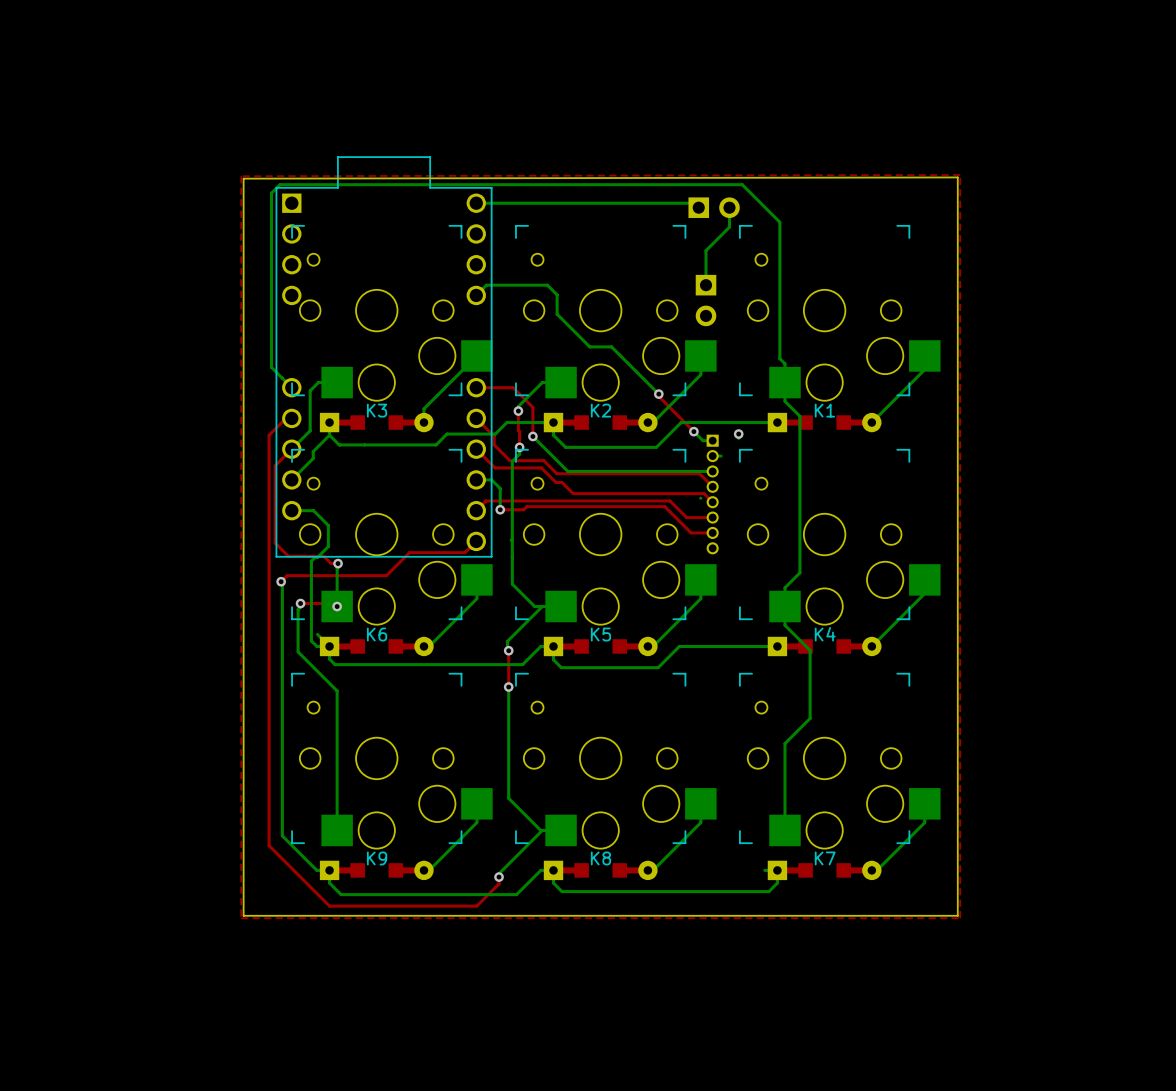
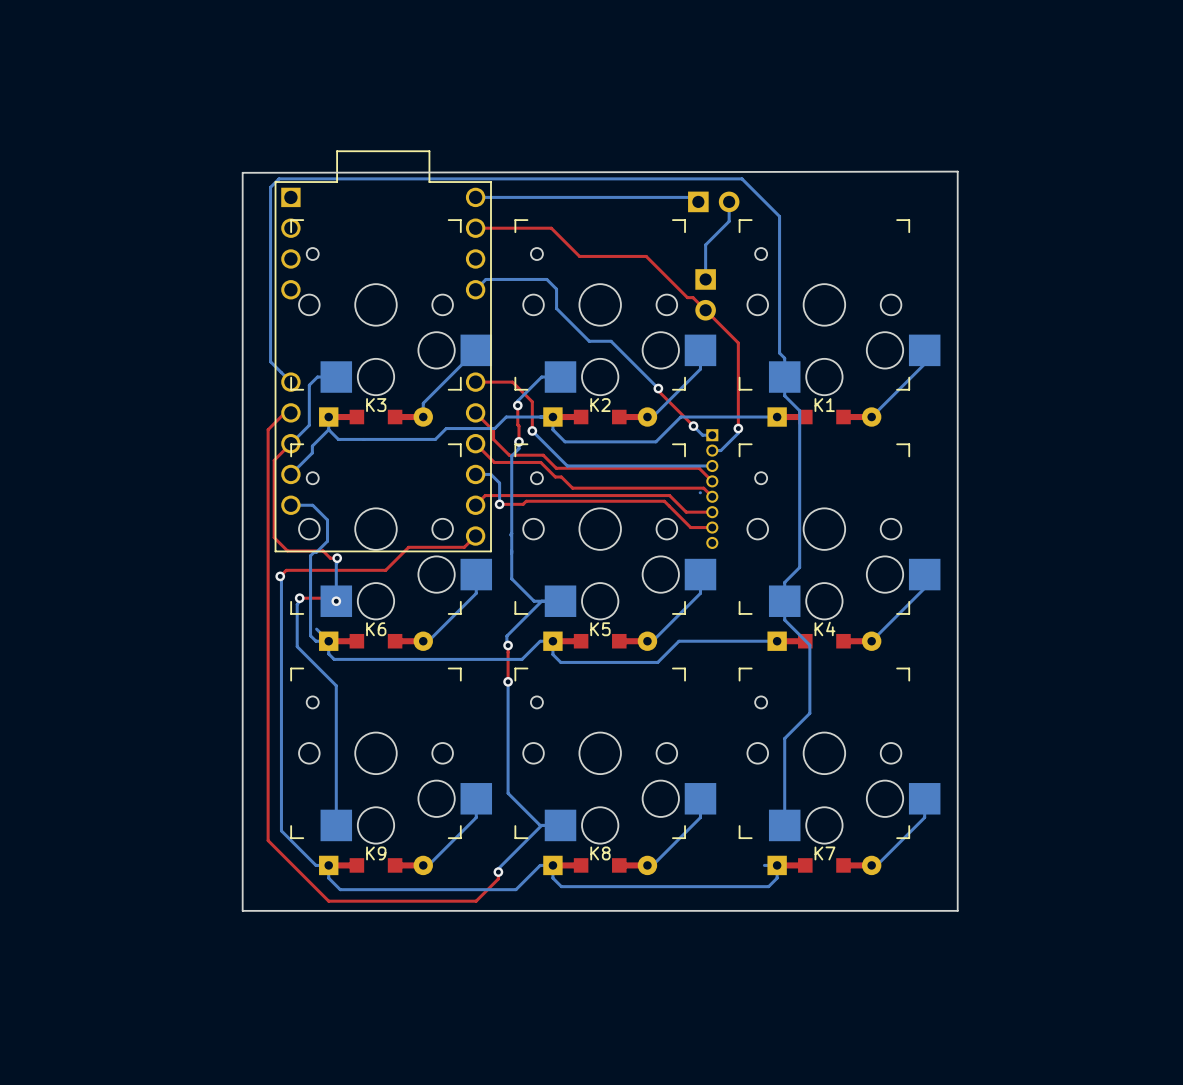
top zone outline: (960, 175) (960, 918) (241, 918) (241, 176) (960, 175) -> none
top track: none -> (475, 228) (551, 228) (579, 256) (646, 256) (687, 297) (693, 297) (738, 342) (738, 428)
bottom track: none -> (738, 433) (720, 450)

